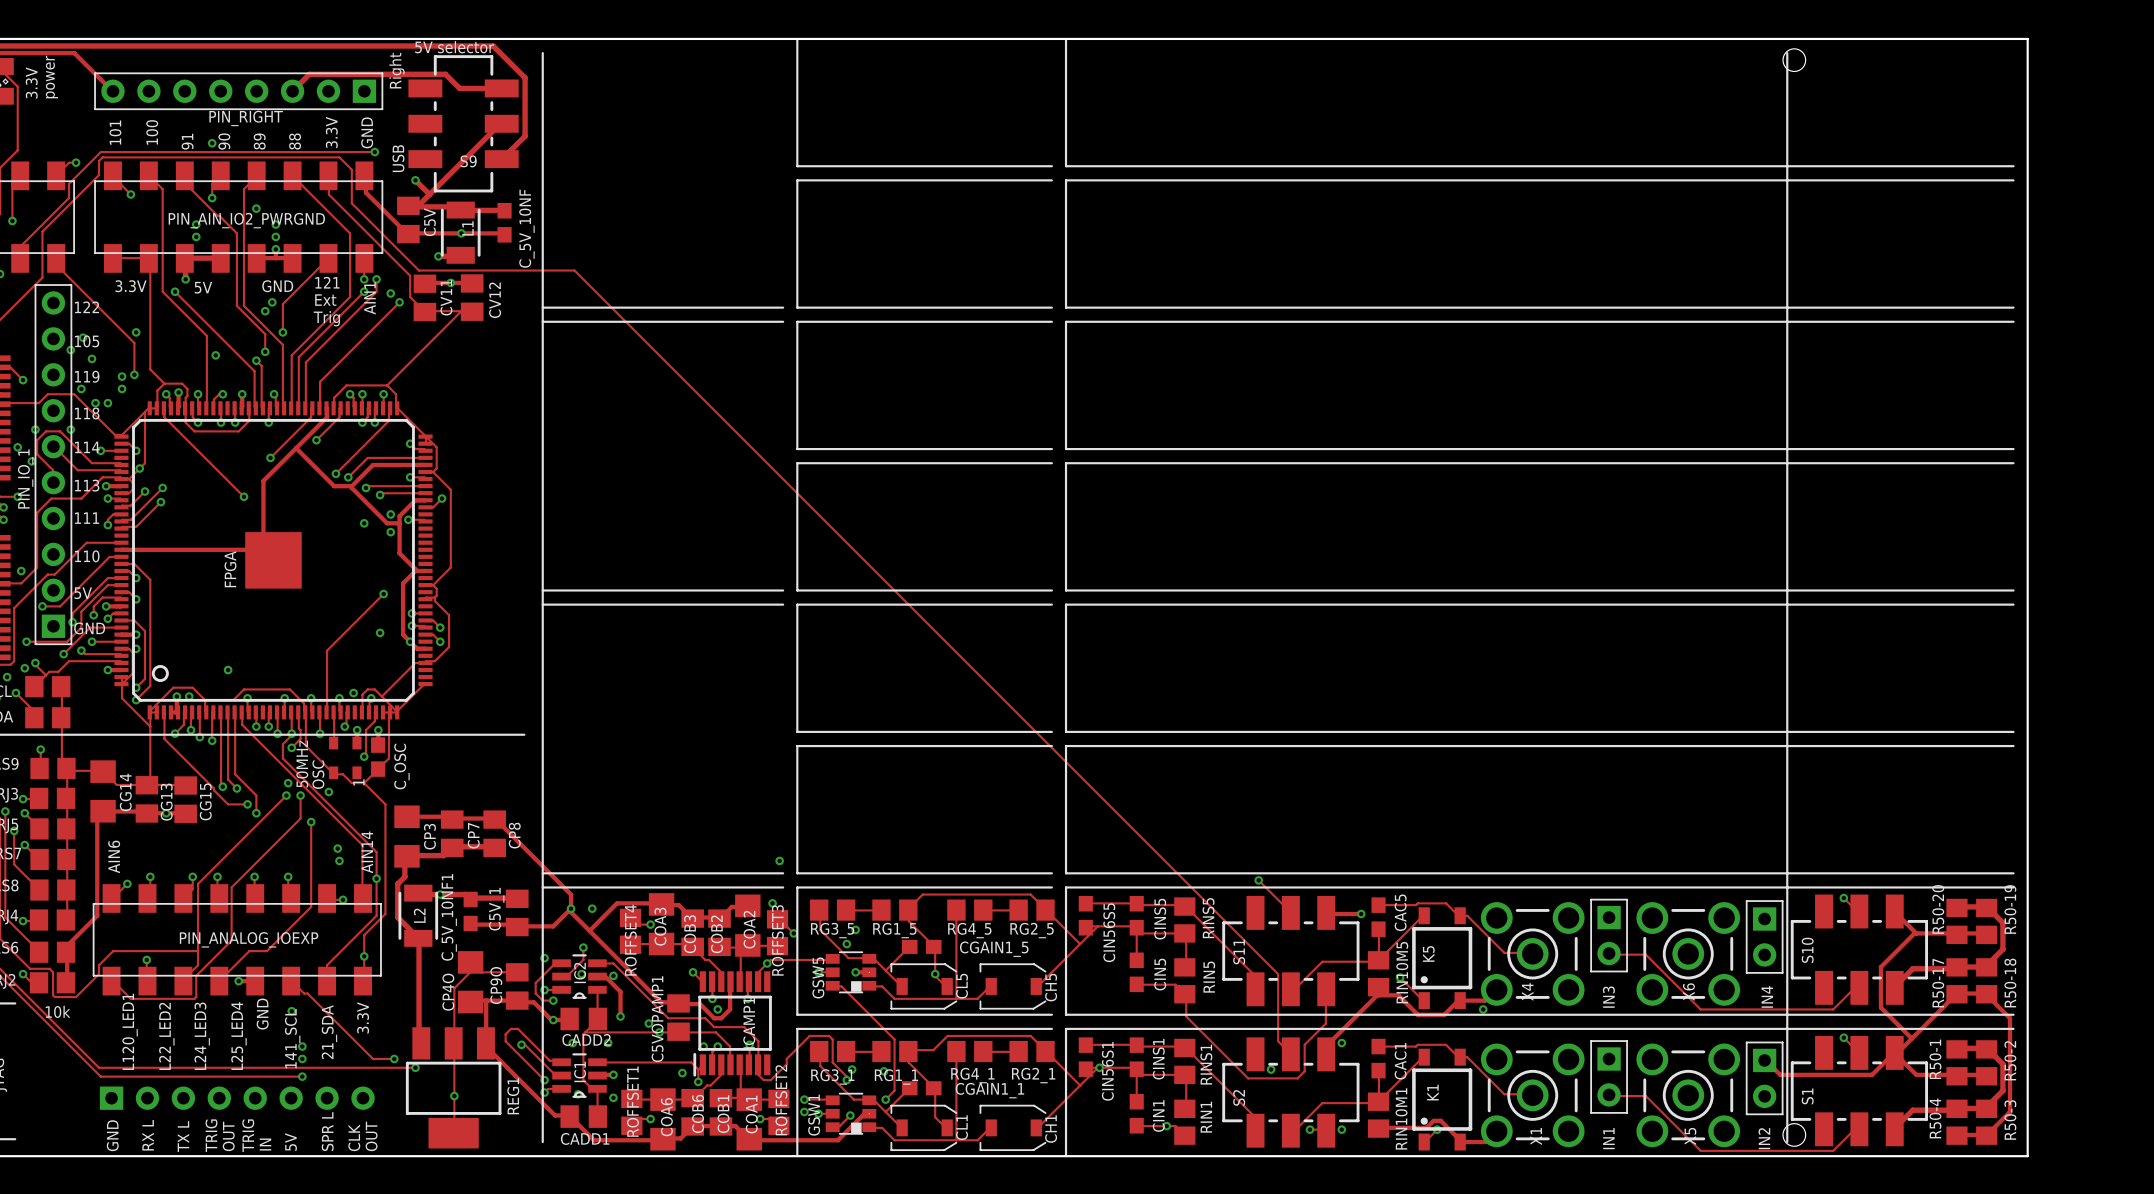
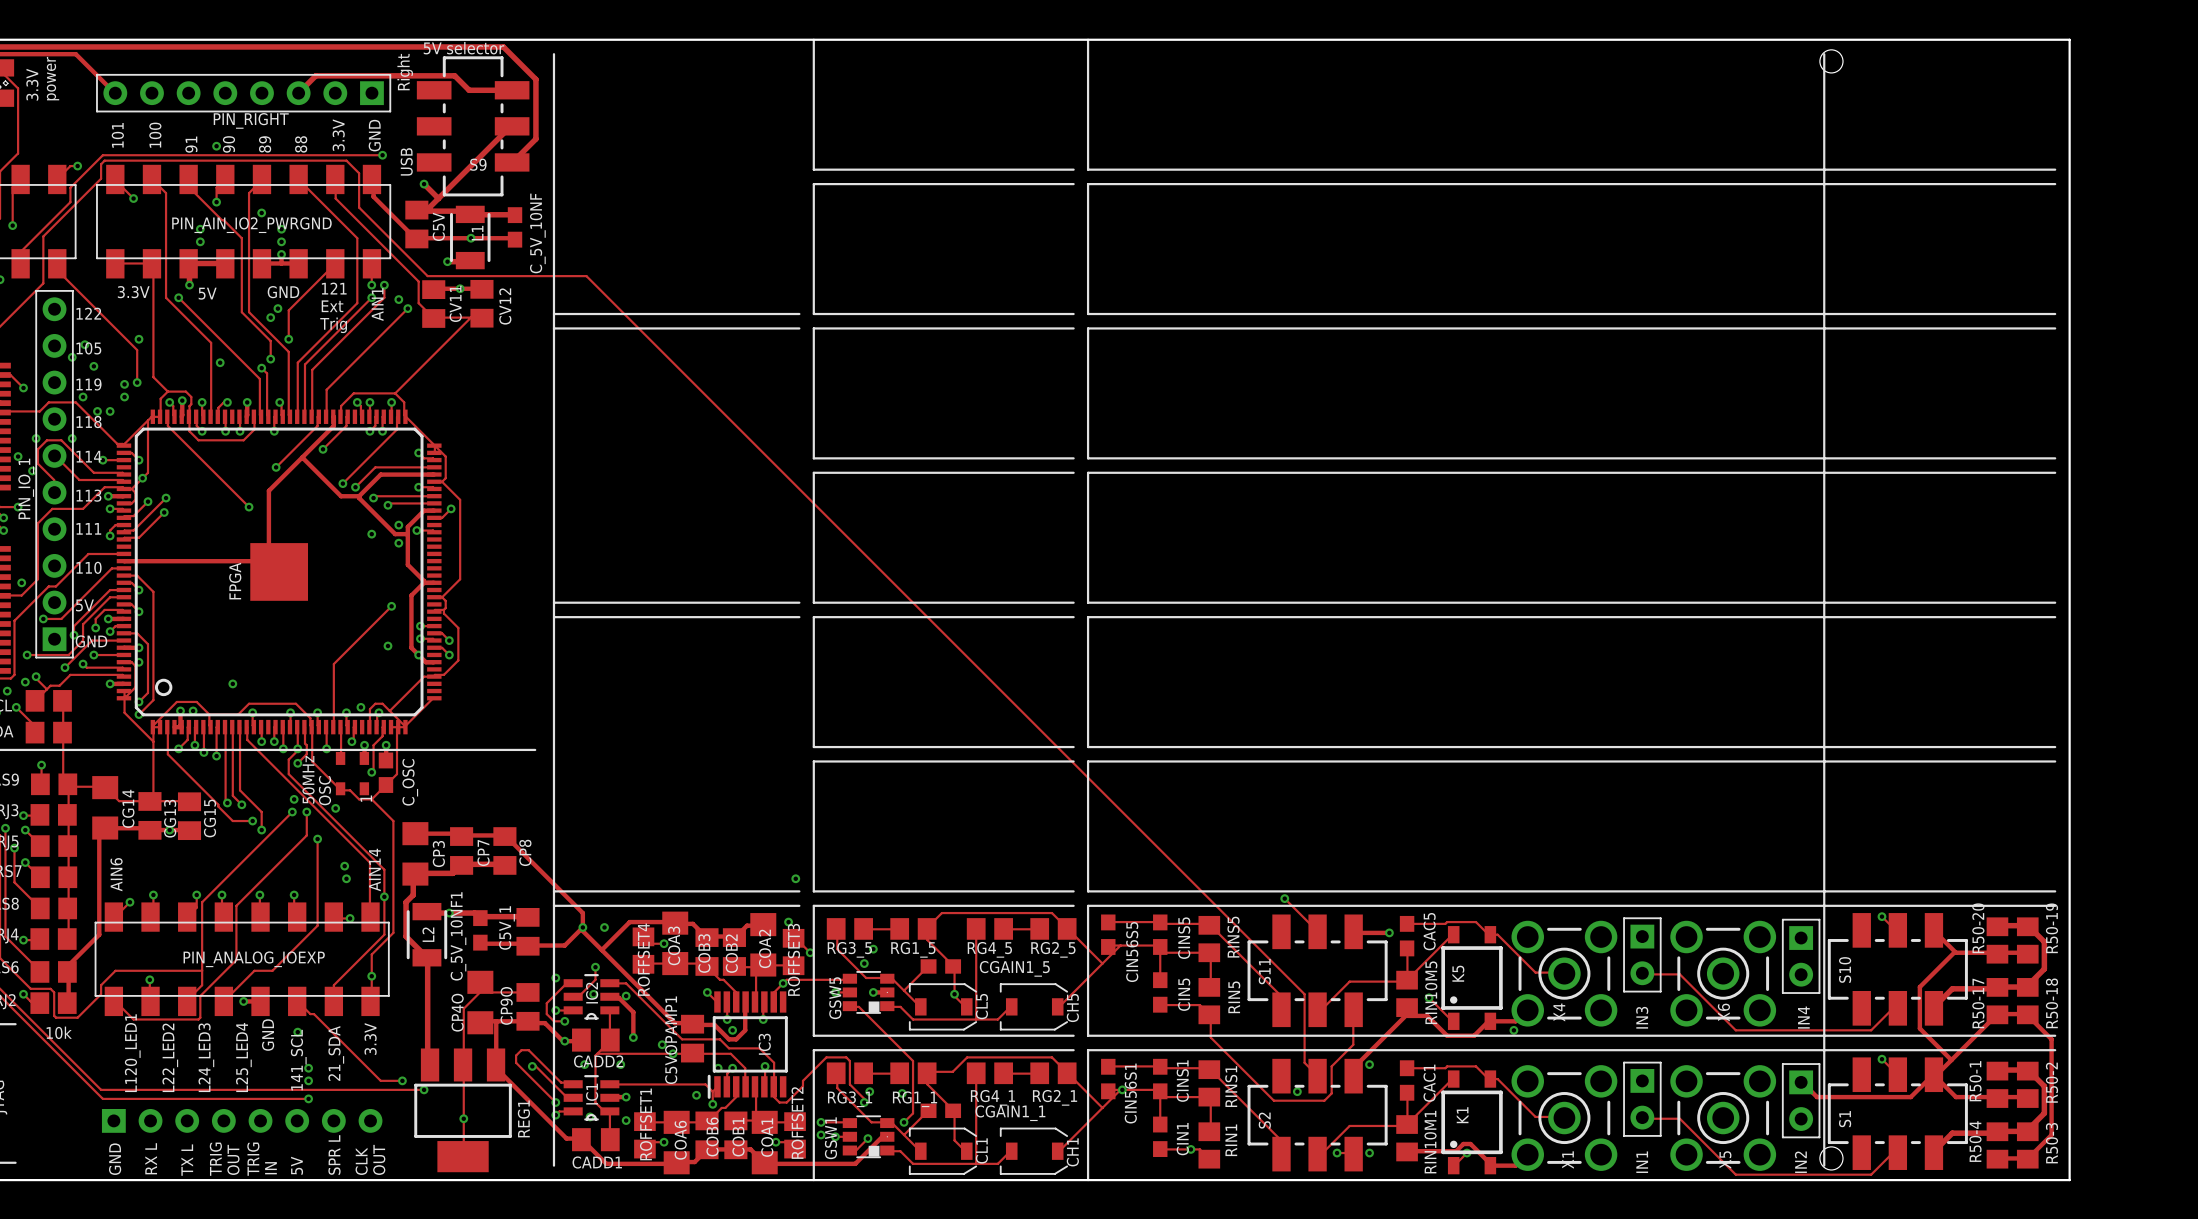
ICAMP1 name: ICAMP1 (749, 1023) -> IC3 (764, 1044)

